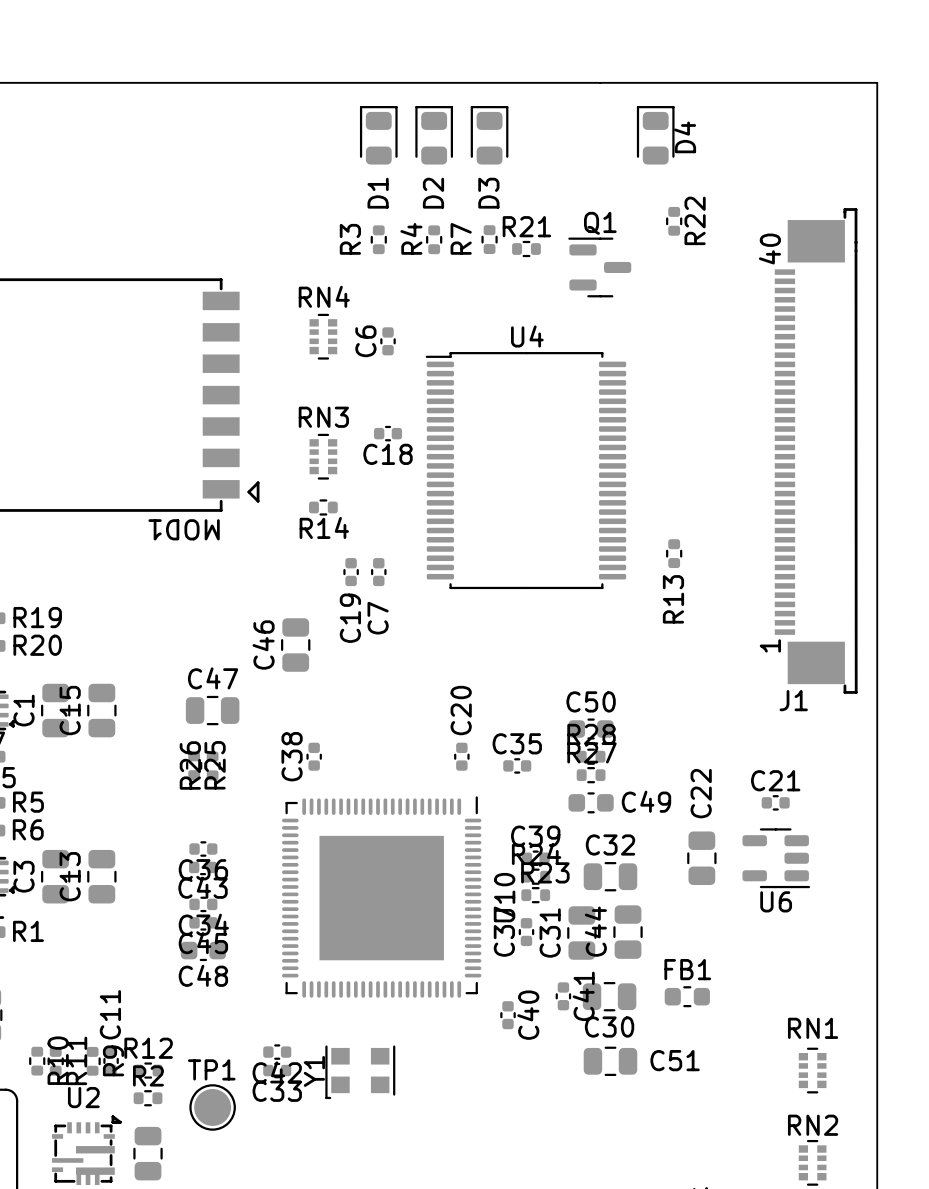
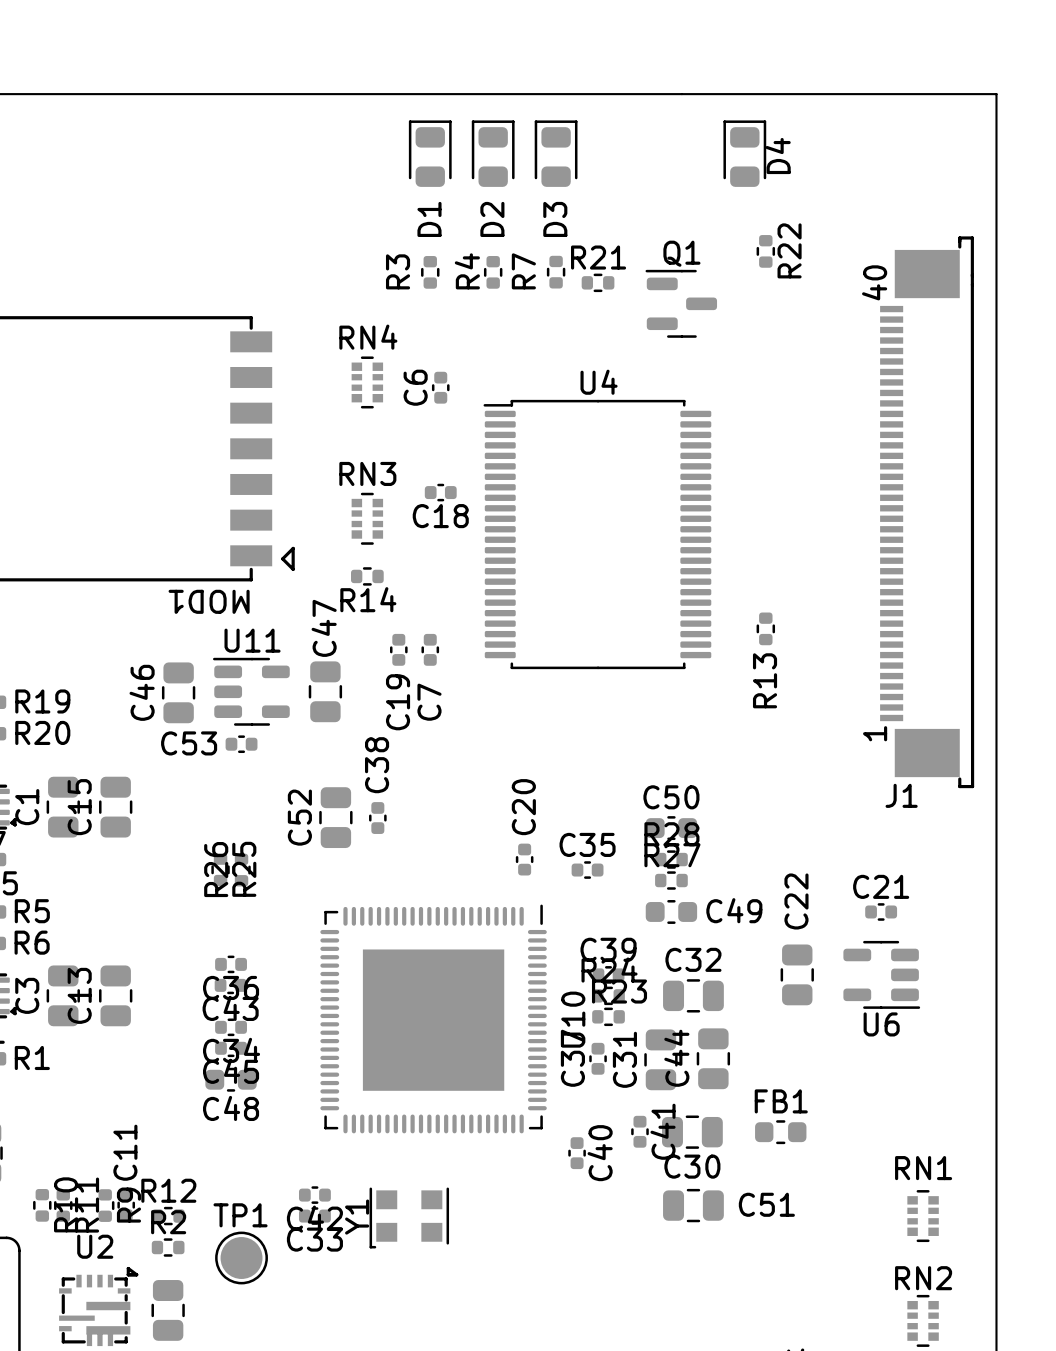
U11: none -> (251, 691)
C46 position: (295, 645) -> (178, 692)
C53: none -> (241, 744)
C47 rotation: 0° (212, 710) -> 90° clockwise (325, 691)
C47 position: (212, 710) -> (325, 691)
C52: none -> (335, 817)
C38 name position: C38 (292, 756) -> C38 (377, 765)
C38 position: (314, 756) -> (377, 818)

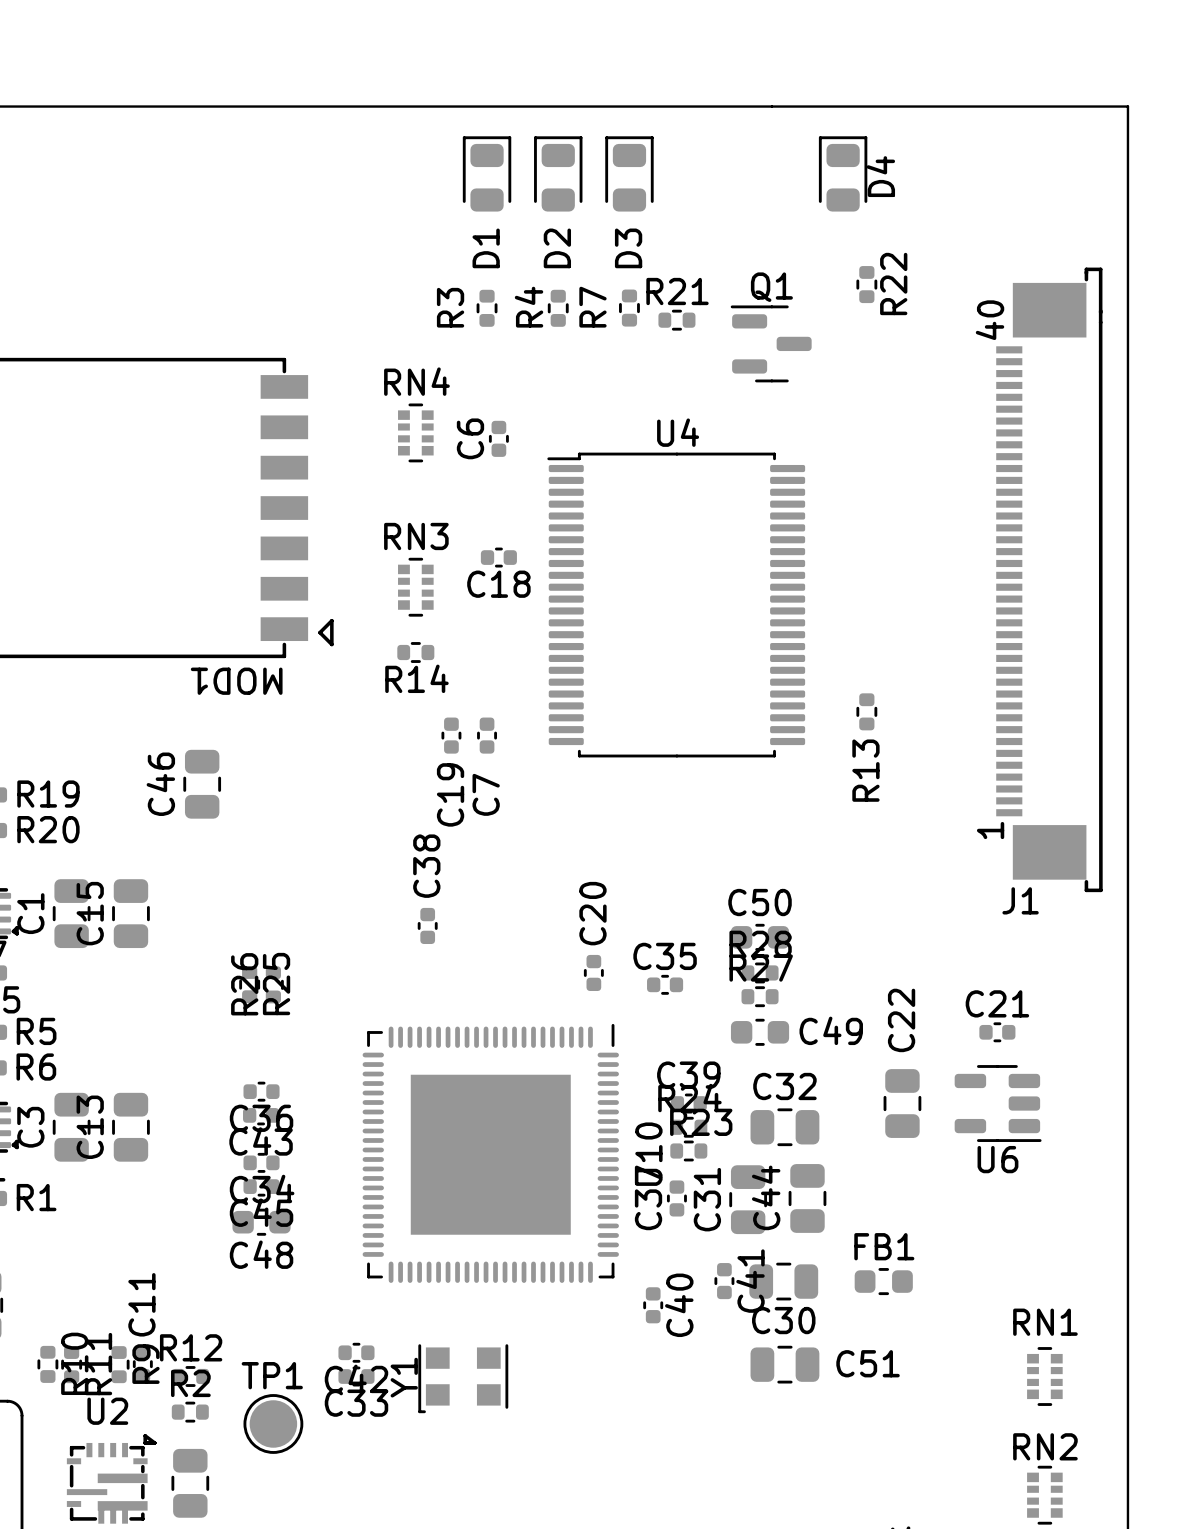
U11: (251, 691) -> none
C47: (325, 691) -> none
C53: (241, 744) -> none
C52: (335, 817) -> none

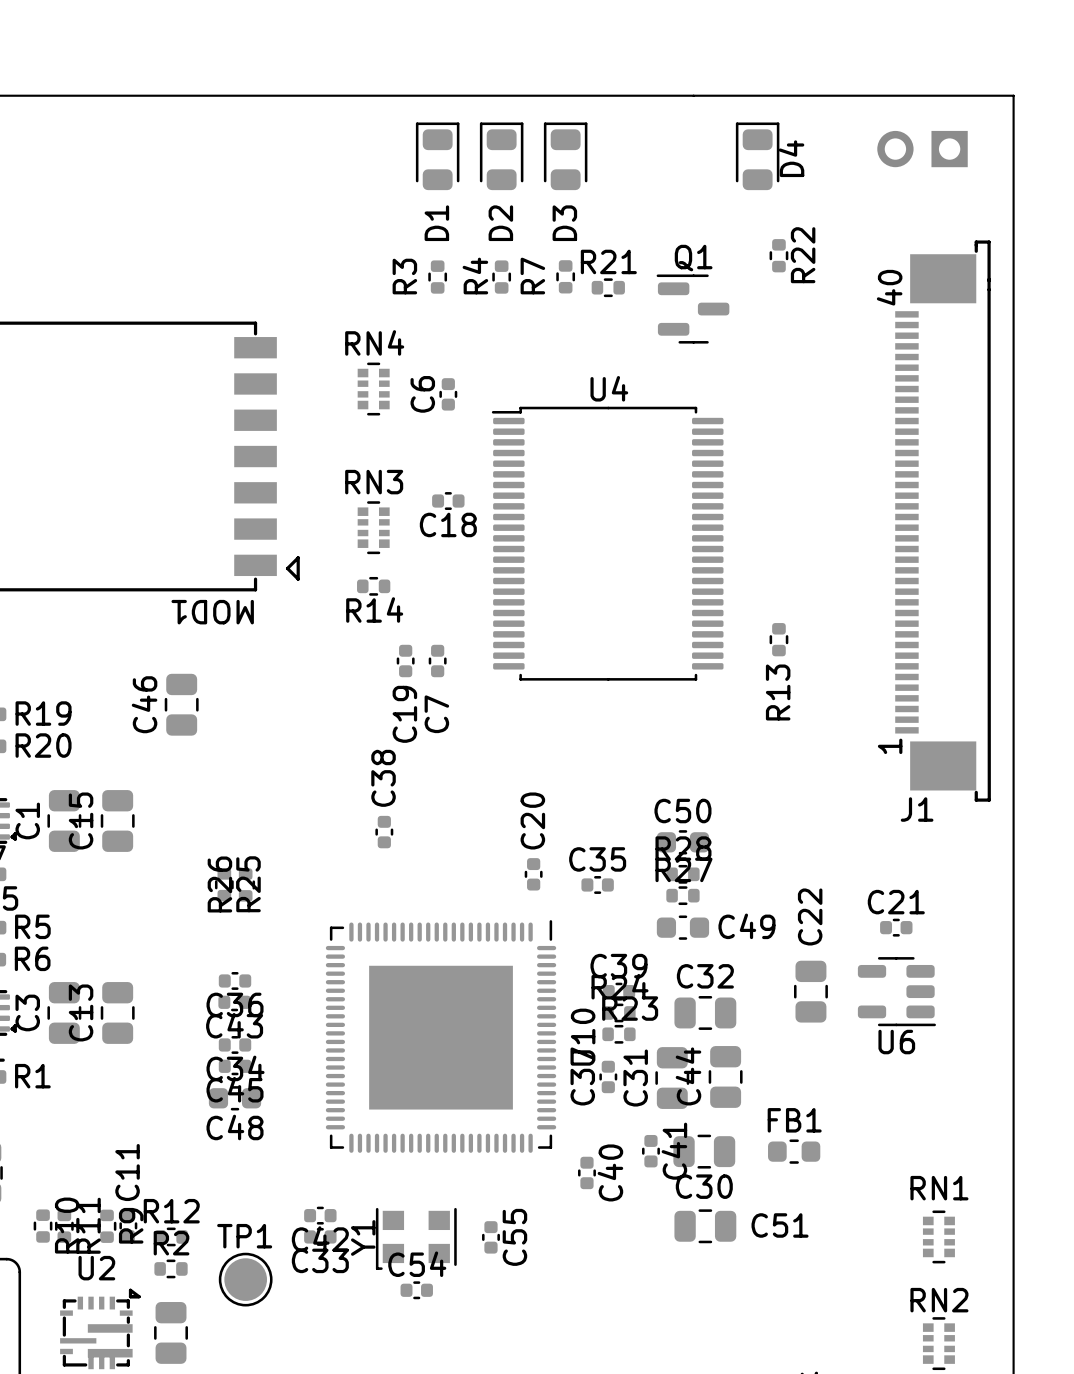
part: none -> (922, 149)
C55: none -> (490, 1237)
C54: none -> (416, 1290)

